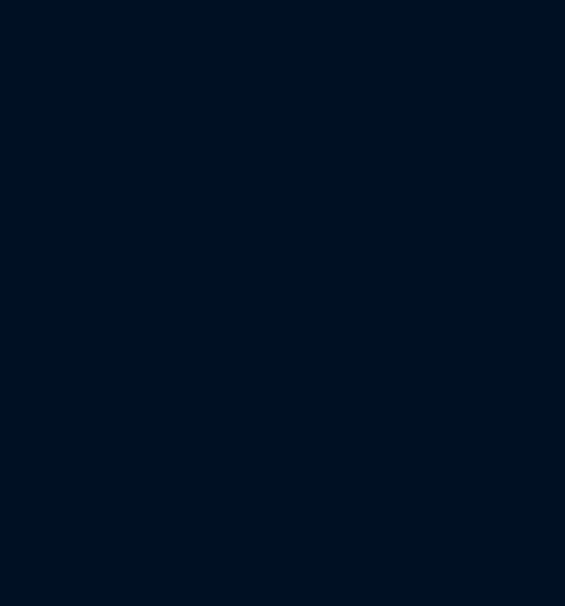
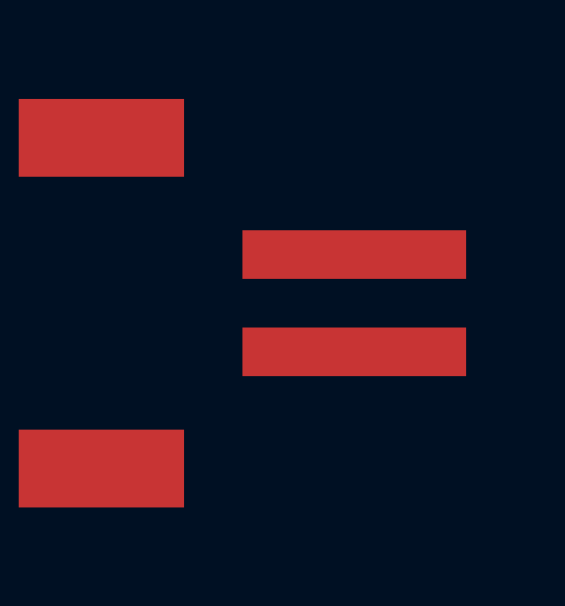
part: none -> (242, 303)

